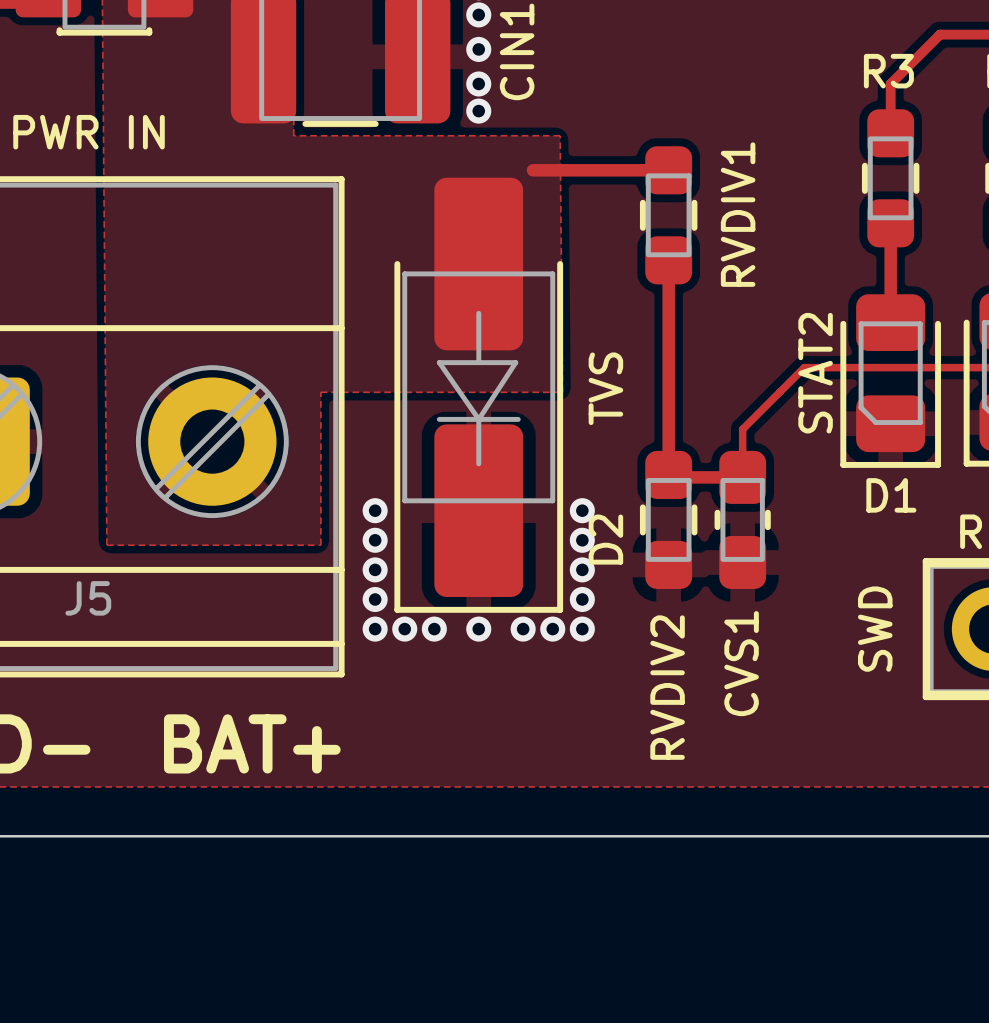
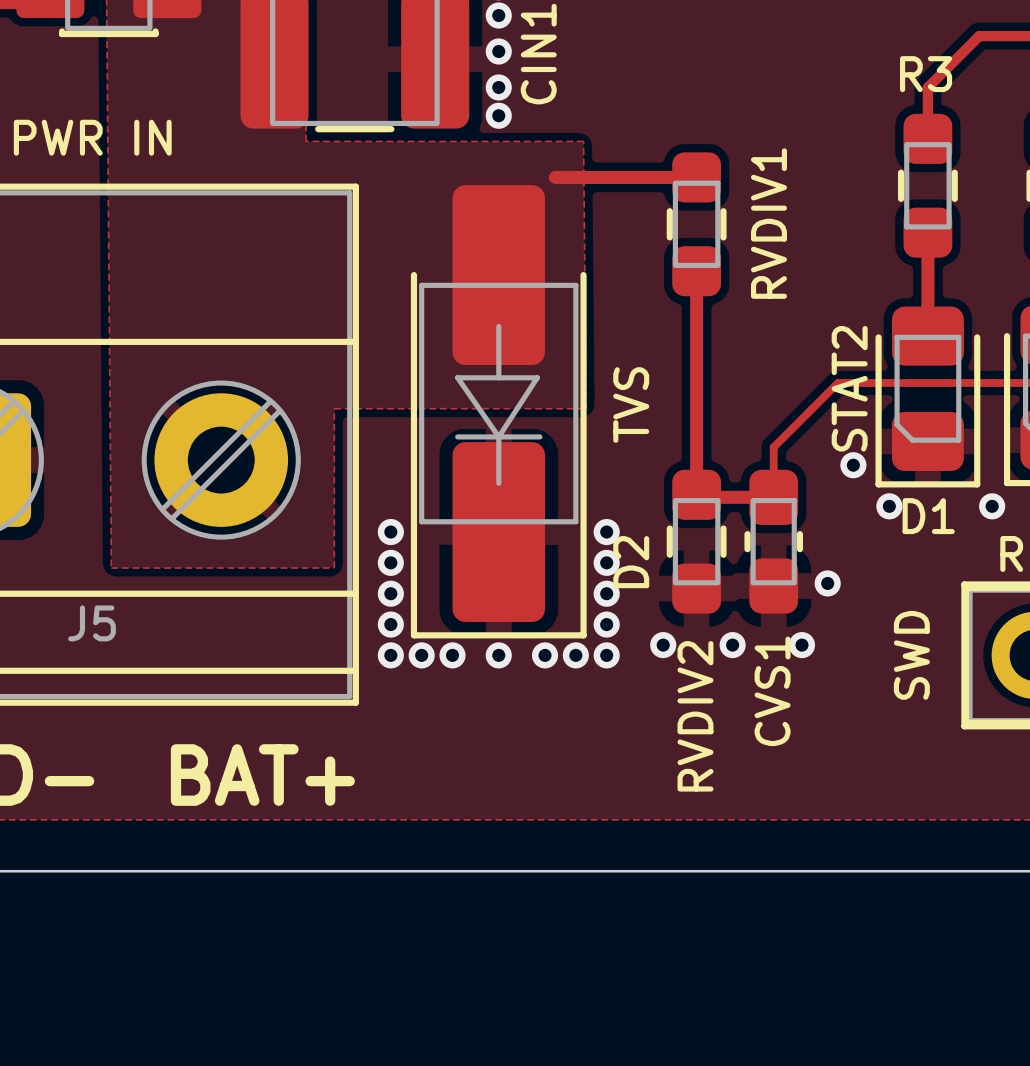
via: none -> (853, 465)
via: none -> (889, 506)
via: none -> (992, 506)
via: none -> (827, 583)
via: none -> (663, 645)
via: none -> (732, 645)
via: none -> (801, 645)

